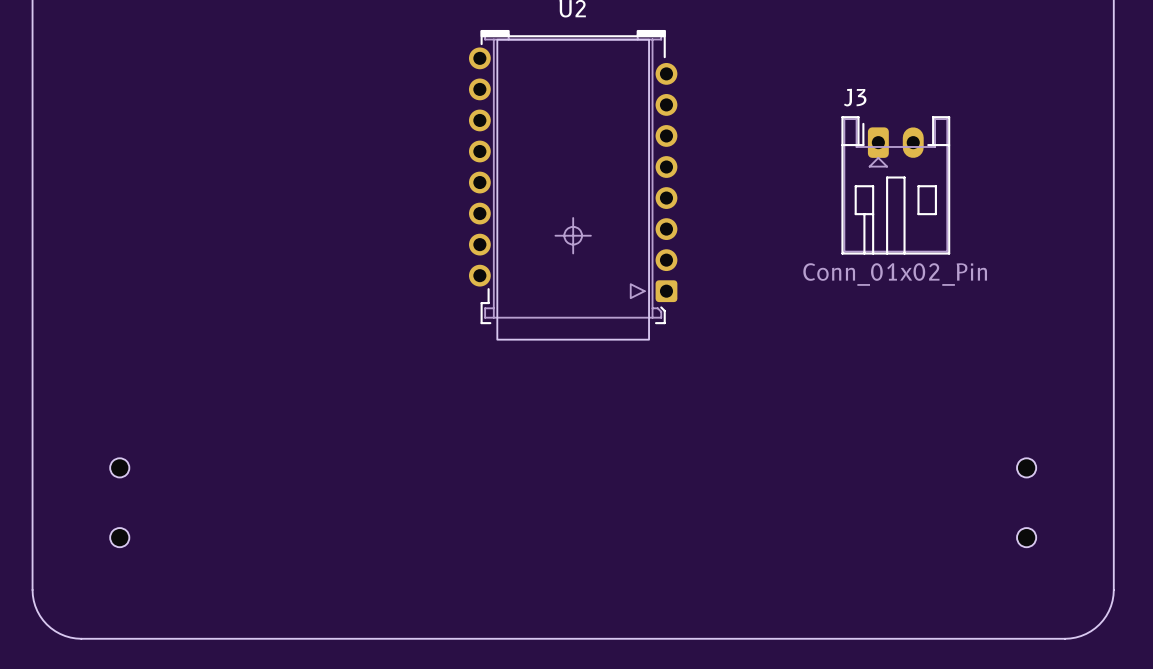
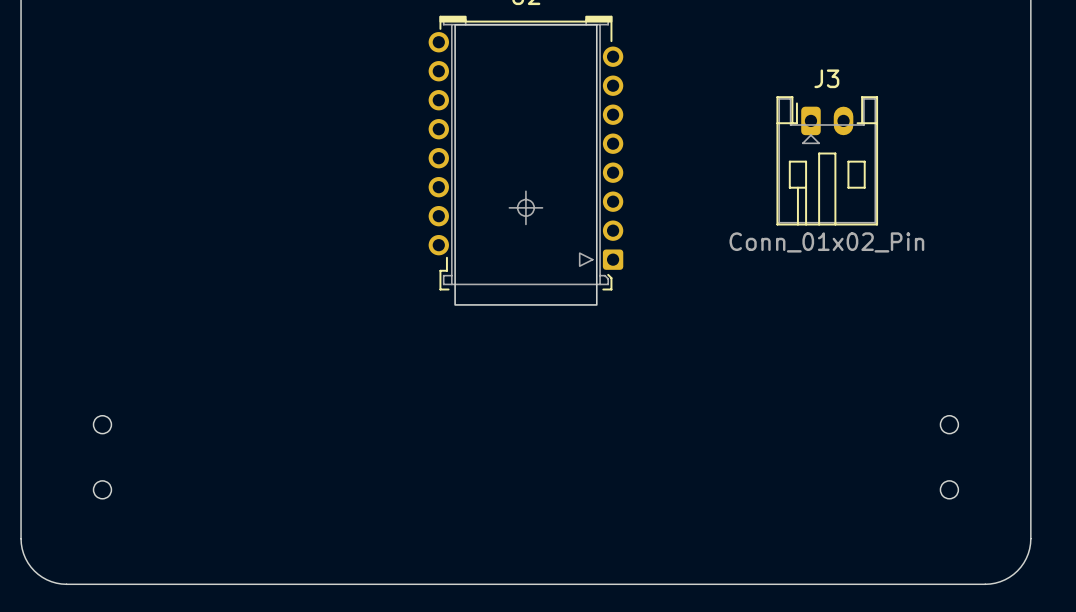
J3 name position: J3 (855, 97) -> J3 (826, 78)

